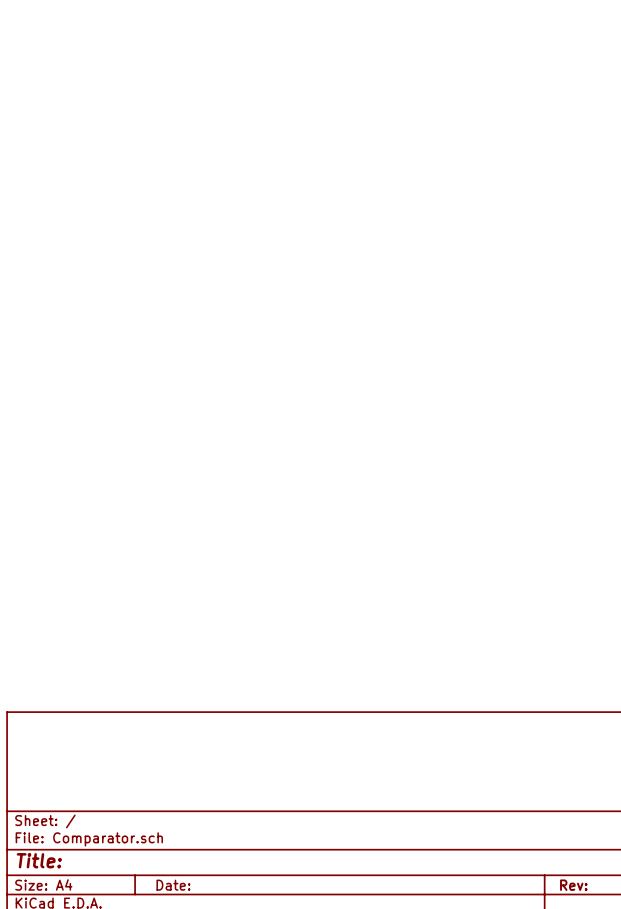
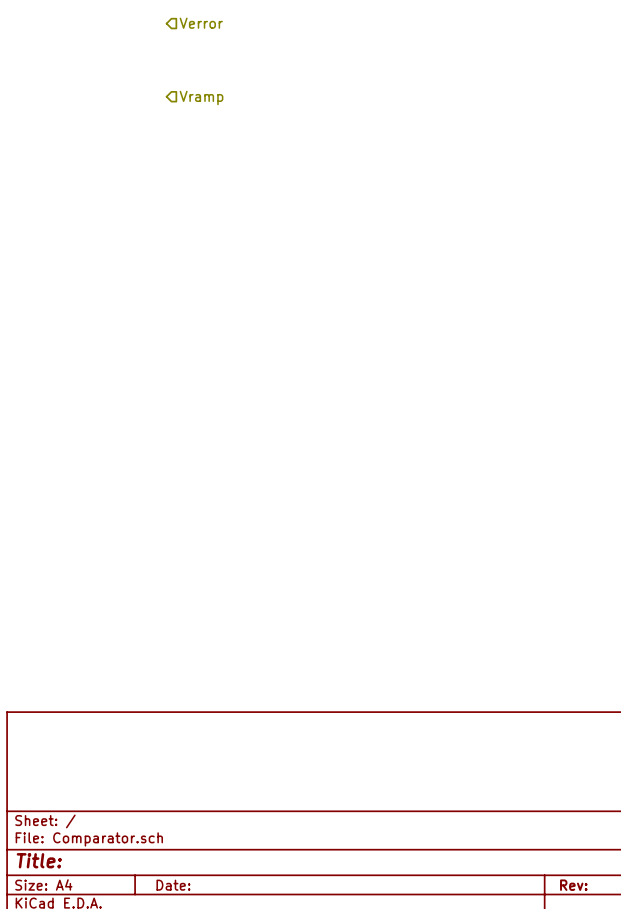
hierarchical label: none -> Verror (201, 23)
hierarchical label: none -> Vramp (201, 97)

